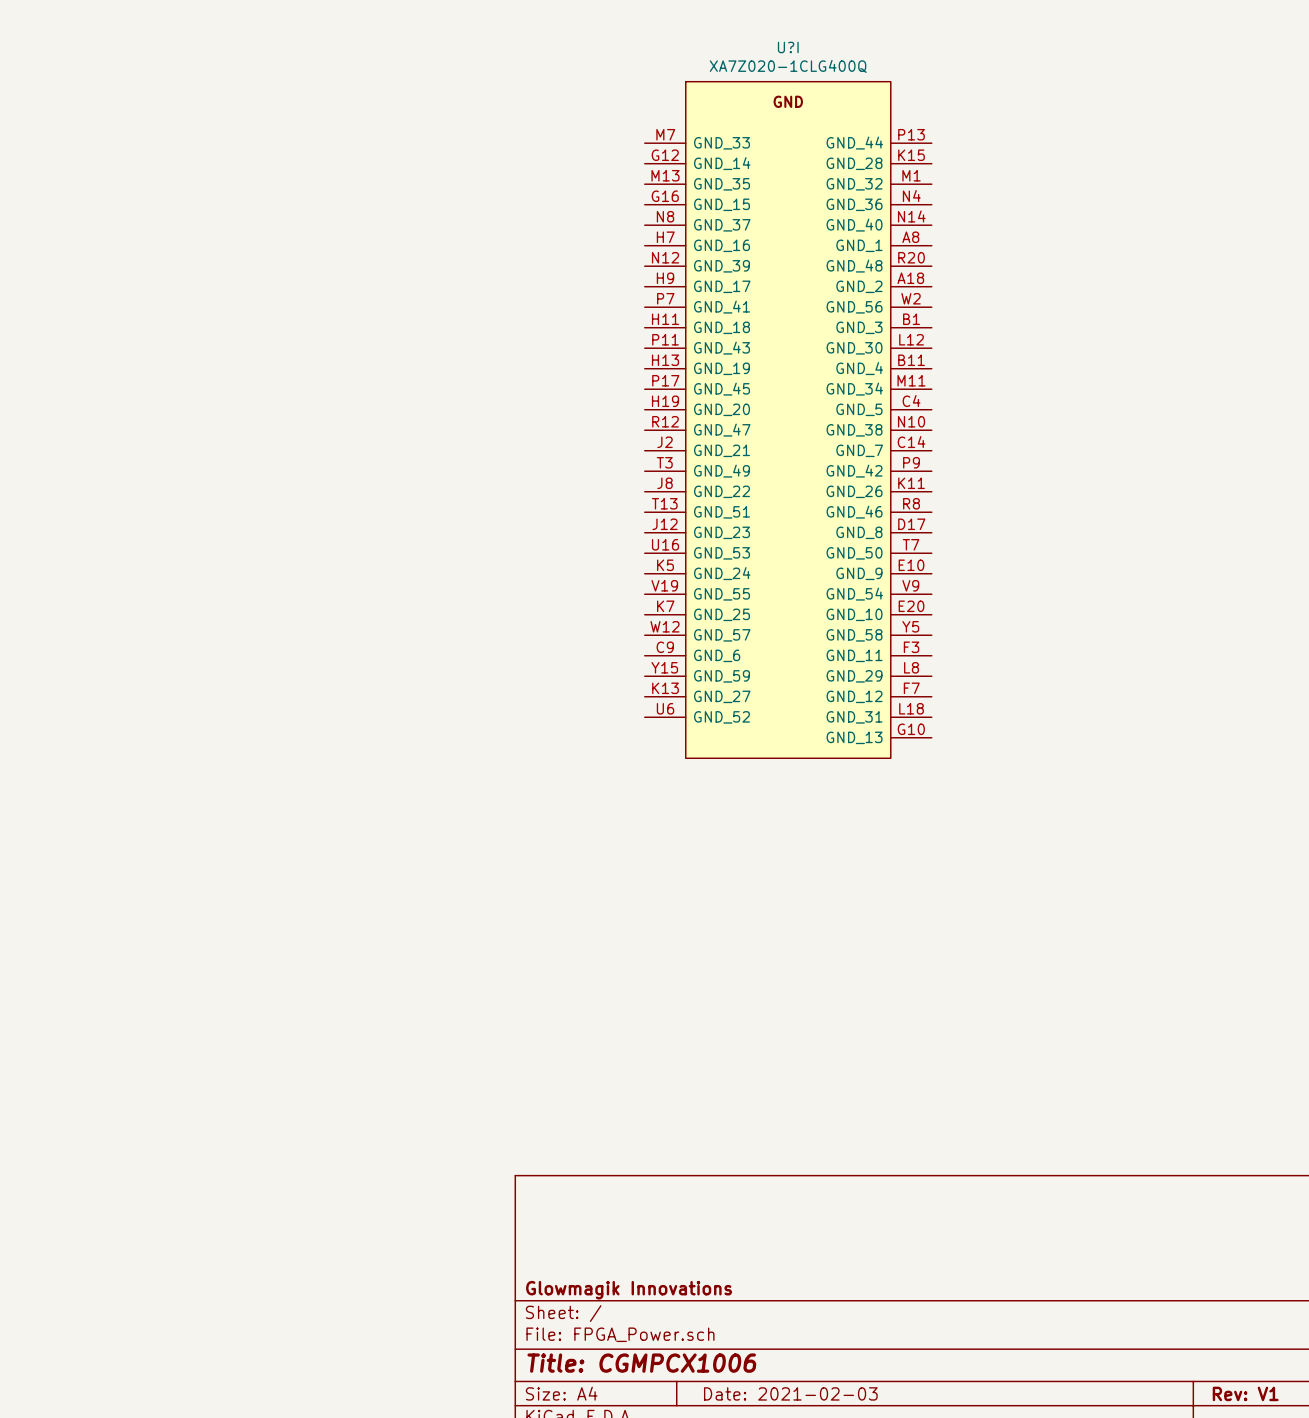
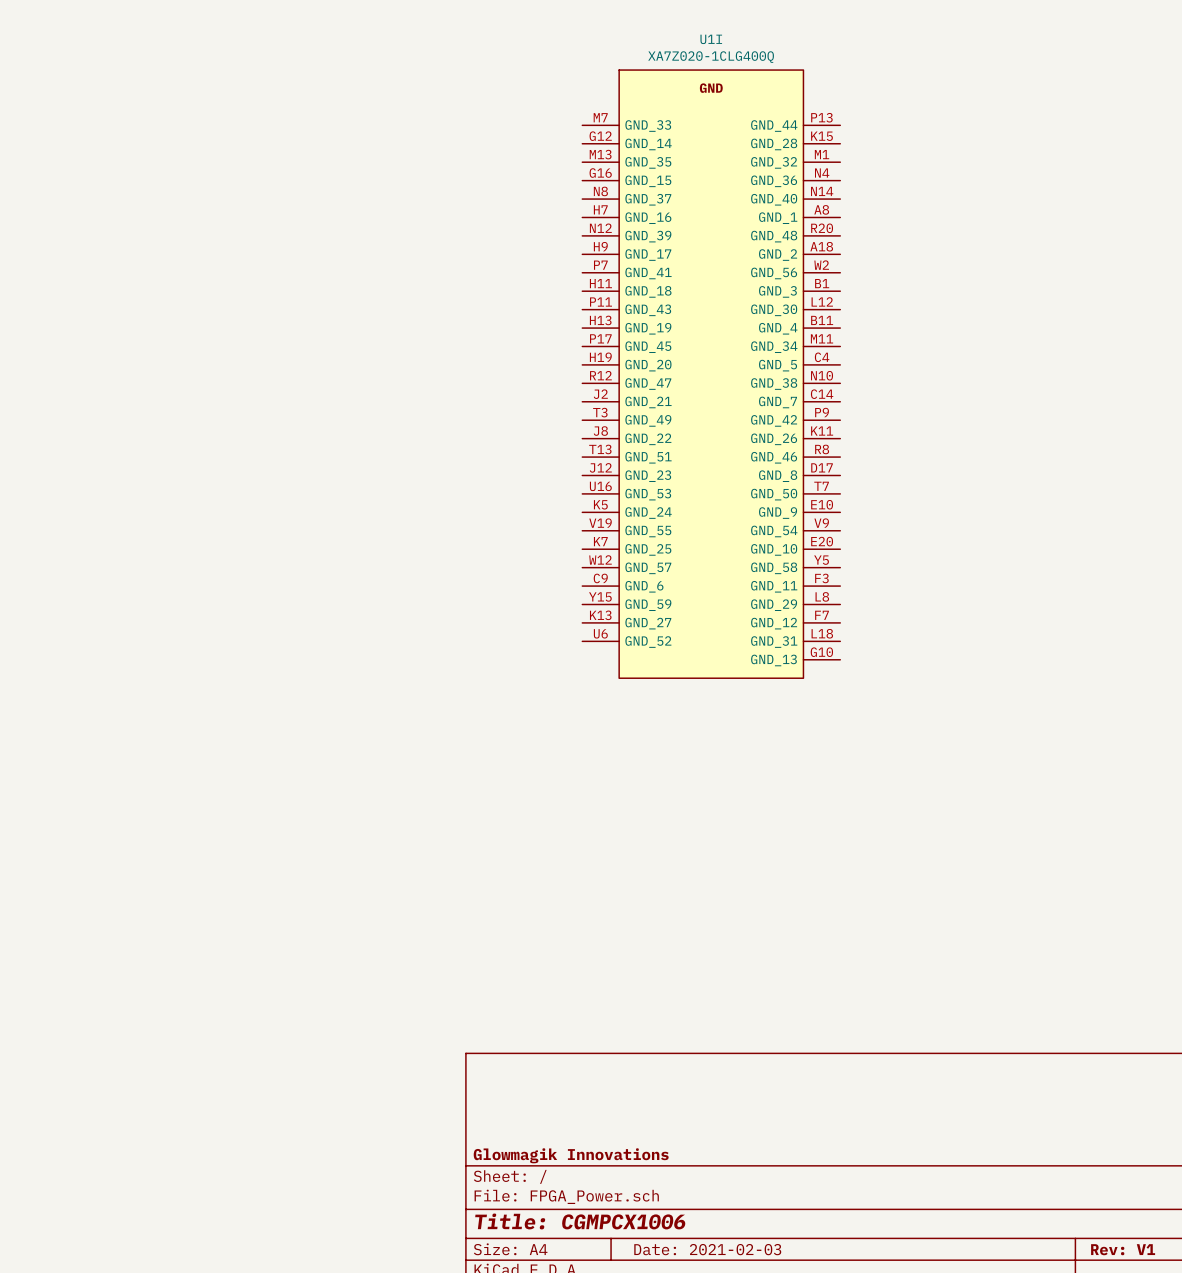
U?I name: U?I (788, 47) -> U1I (711, 39)

